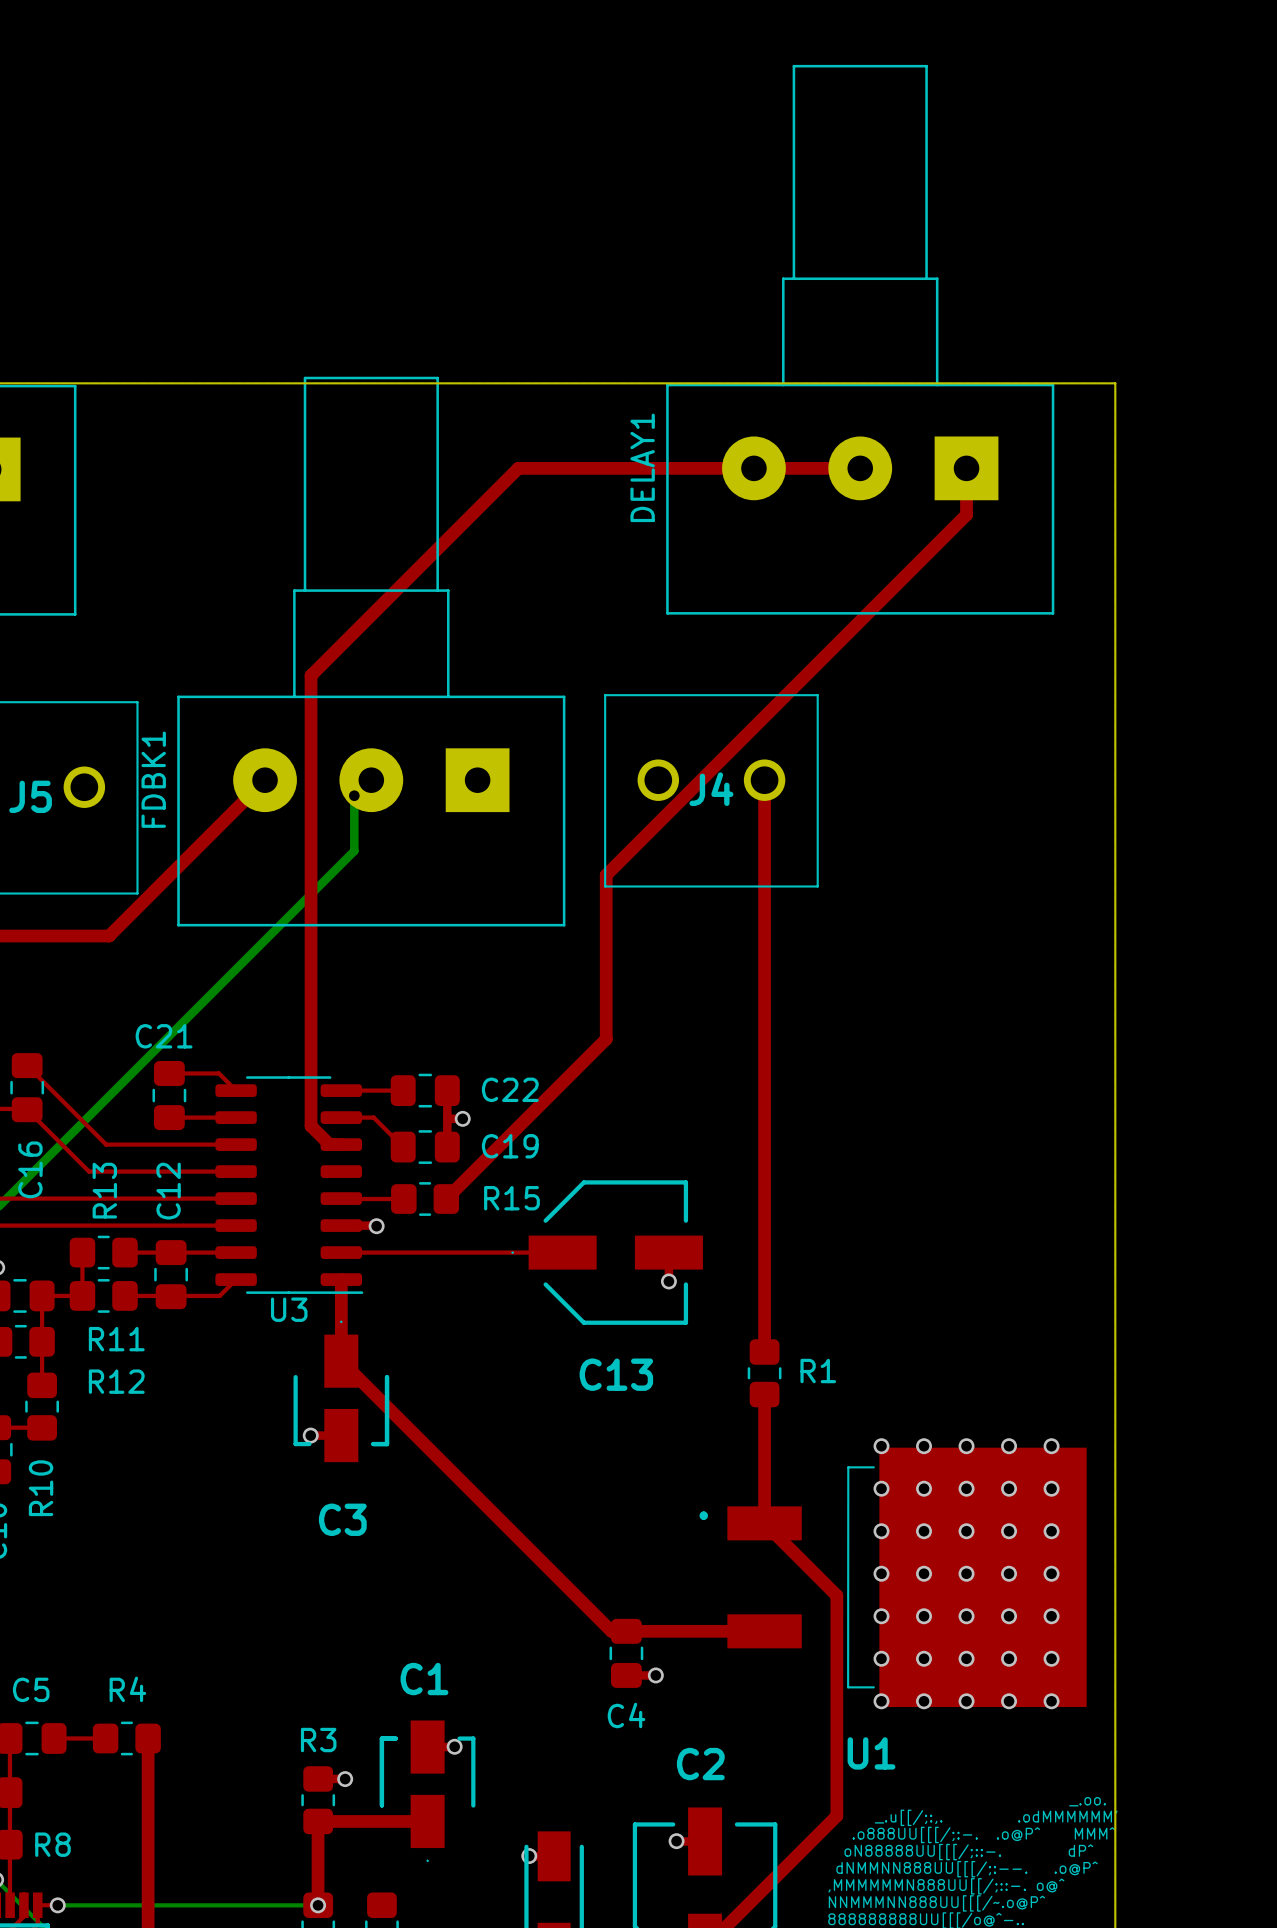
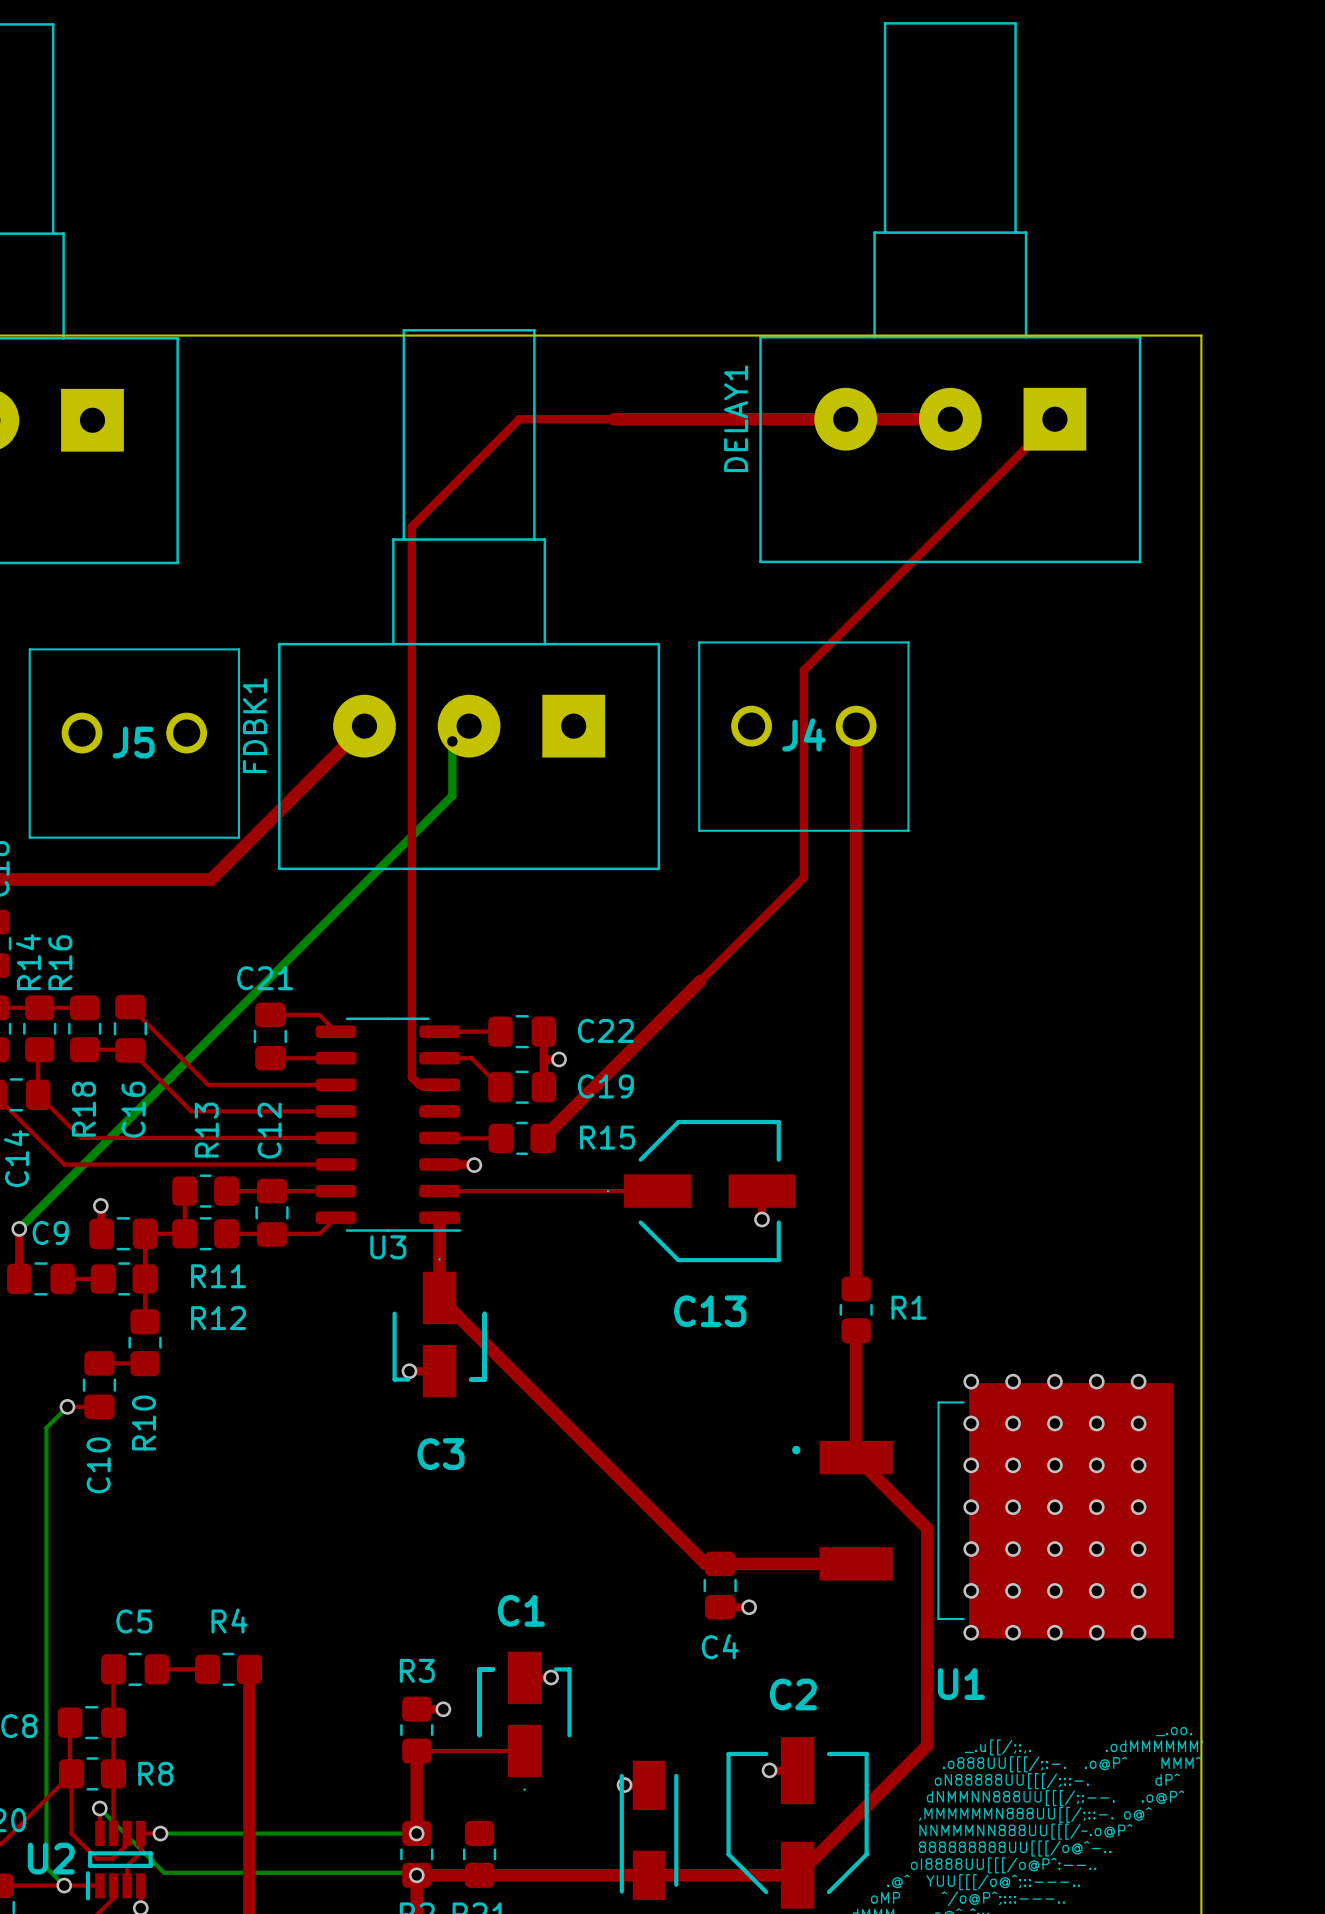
top track: (518, 468) (311, 675) (311, 1126) (329, 1144) -> (613, 419) (519, 419) (411, 526) (411, 1077) (419, 1084) (427, 1084)
top track: (966, 468) (966, 514) (606, 875) (606, 1039) -> (1054, 419) (803, 670) (803, 877) (700, 981)
top track width: thick (318, 1821) (427, 1821) -> thin (416, 1751) (524, 1751)

